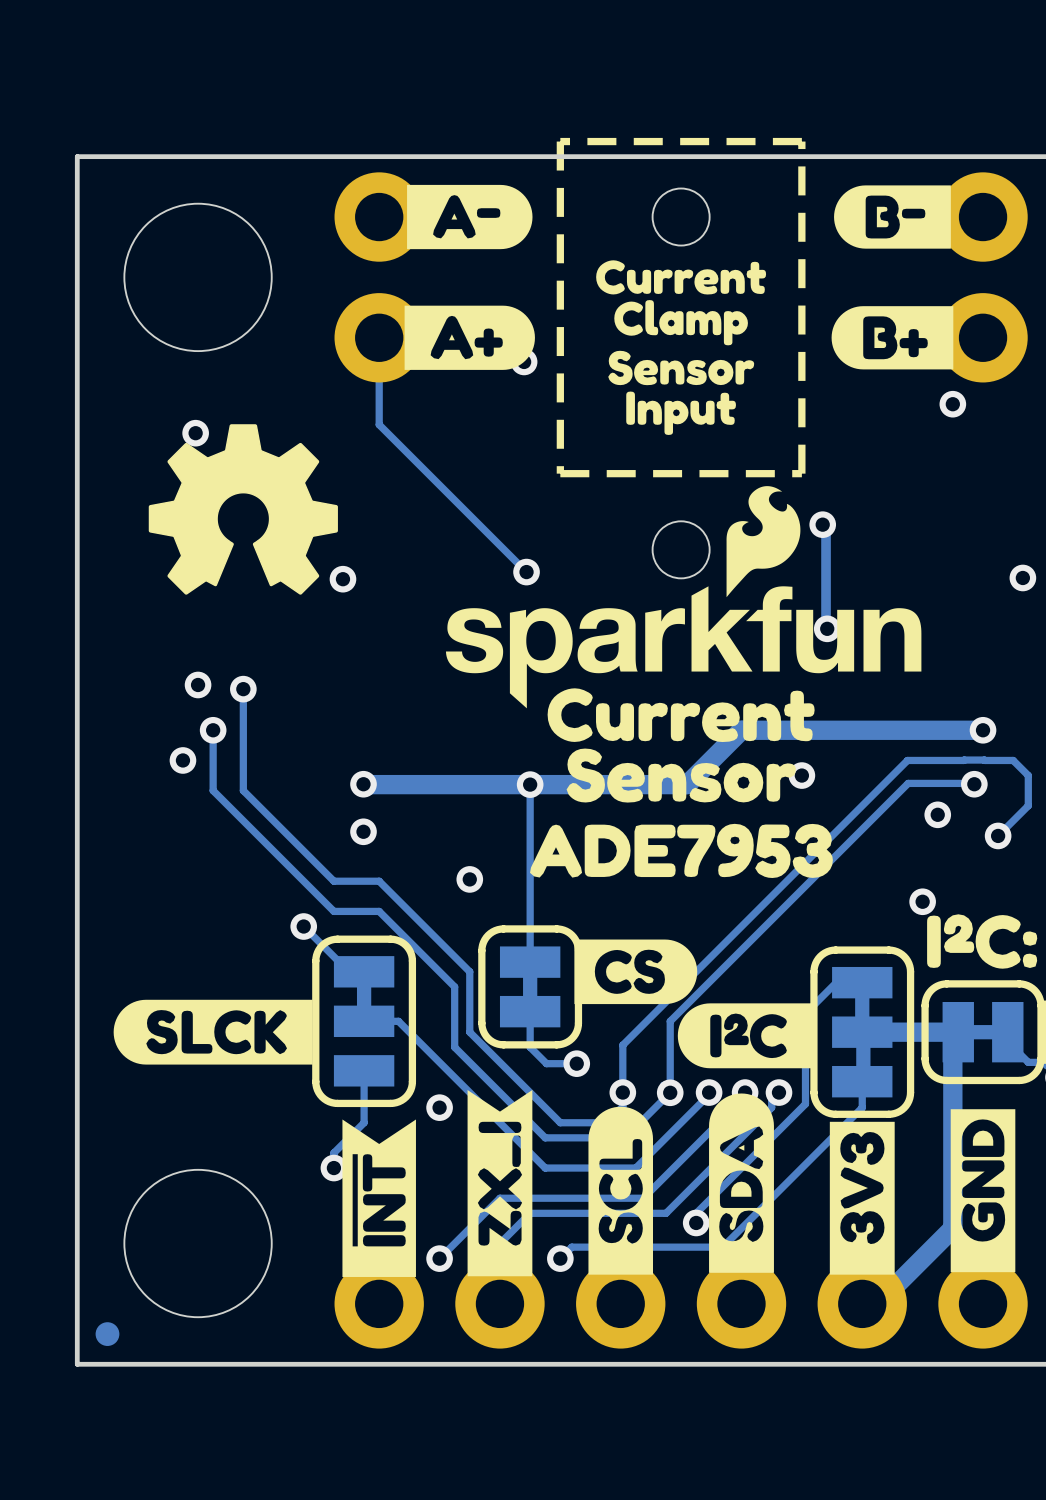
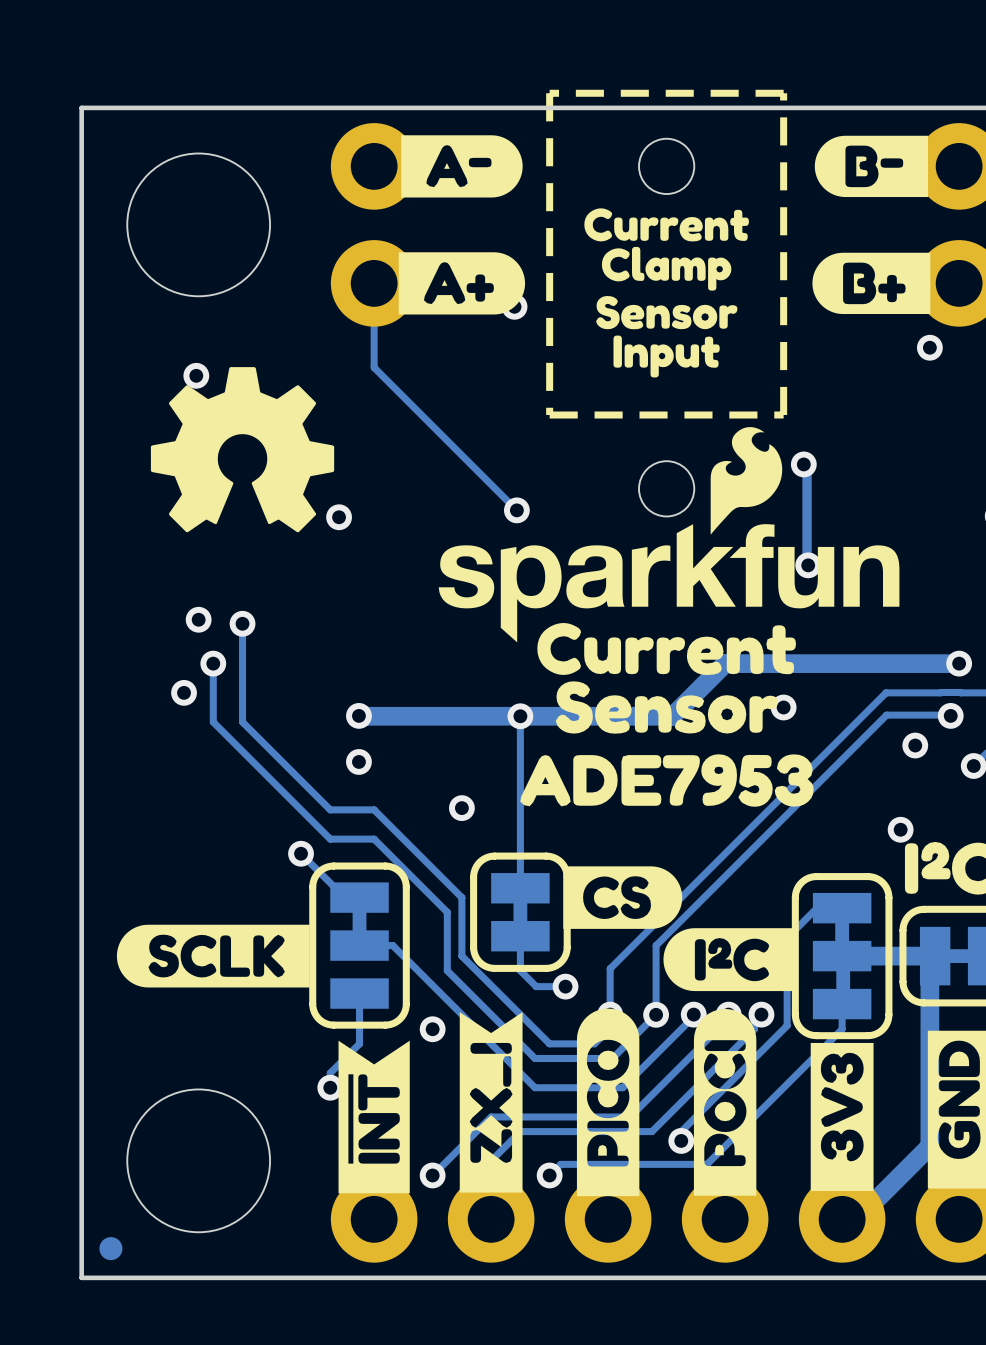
drawing shape: [113, 999, 313, 1065] -> [116, 924, 310, 988]
drawing shape: [709, 1093, 774, 1273] -> [693, 1008, 757, 1196]
drawing shape: [588, 1106, 654, 1275] -> [576, 1008, 640, 1197]

